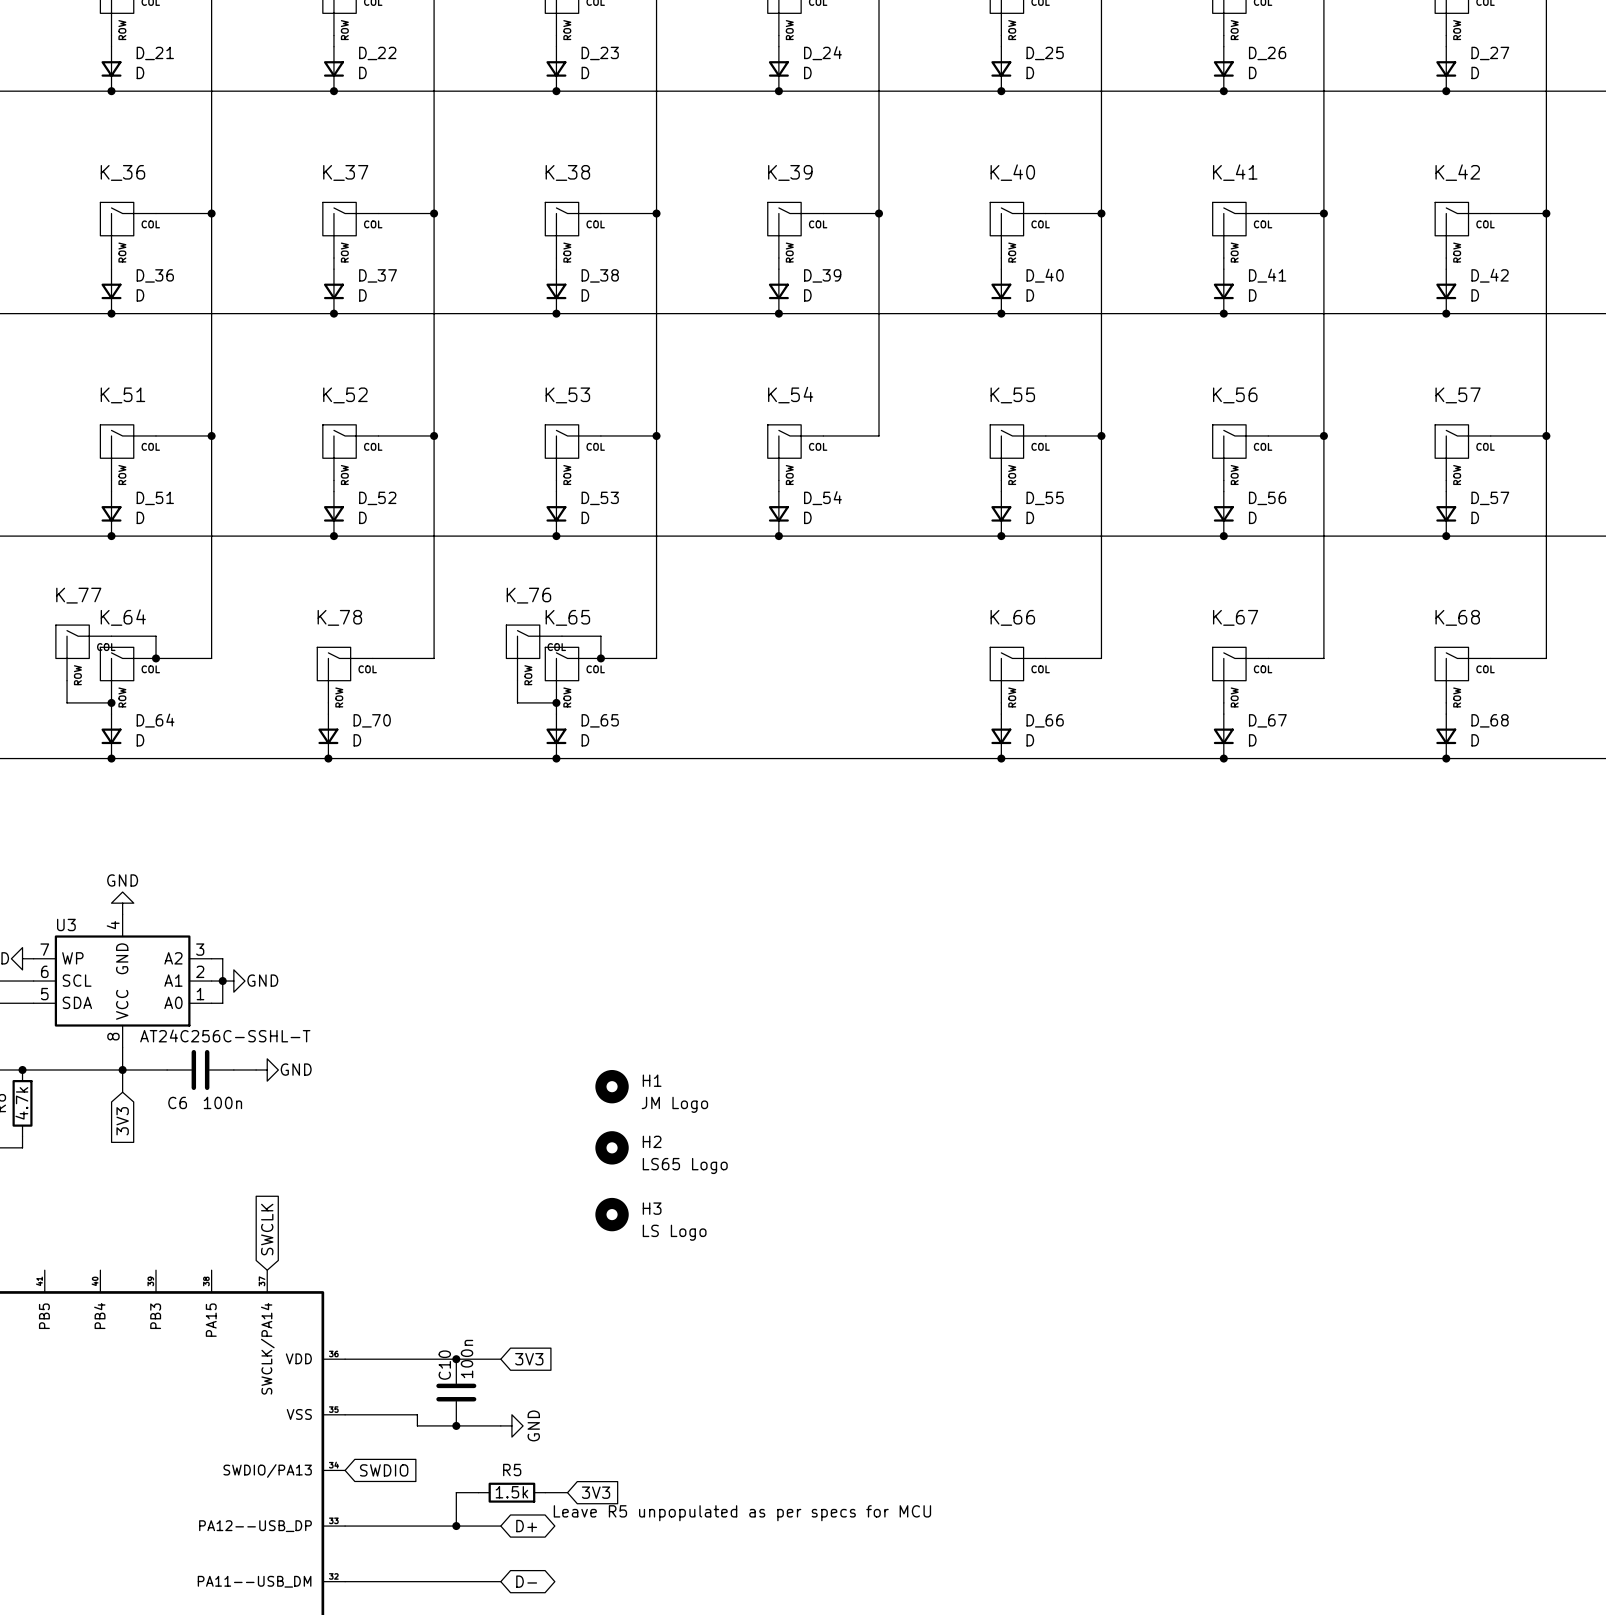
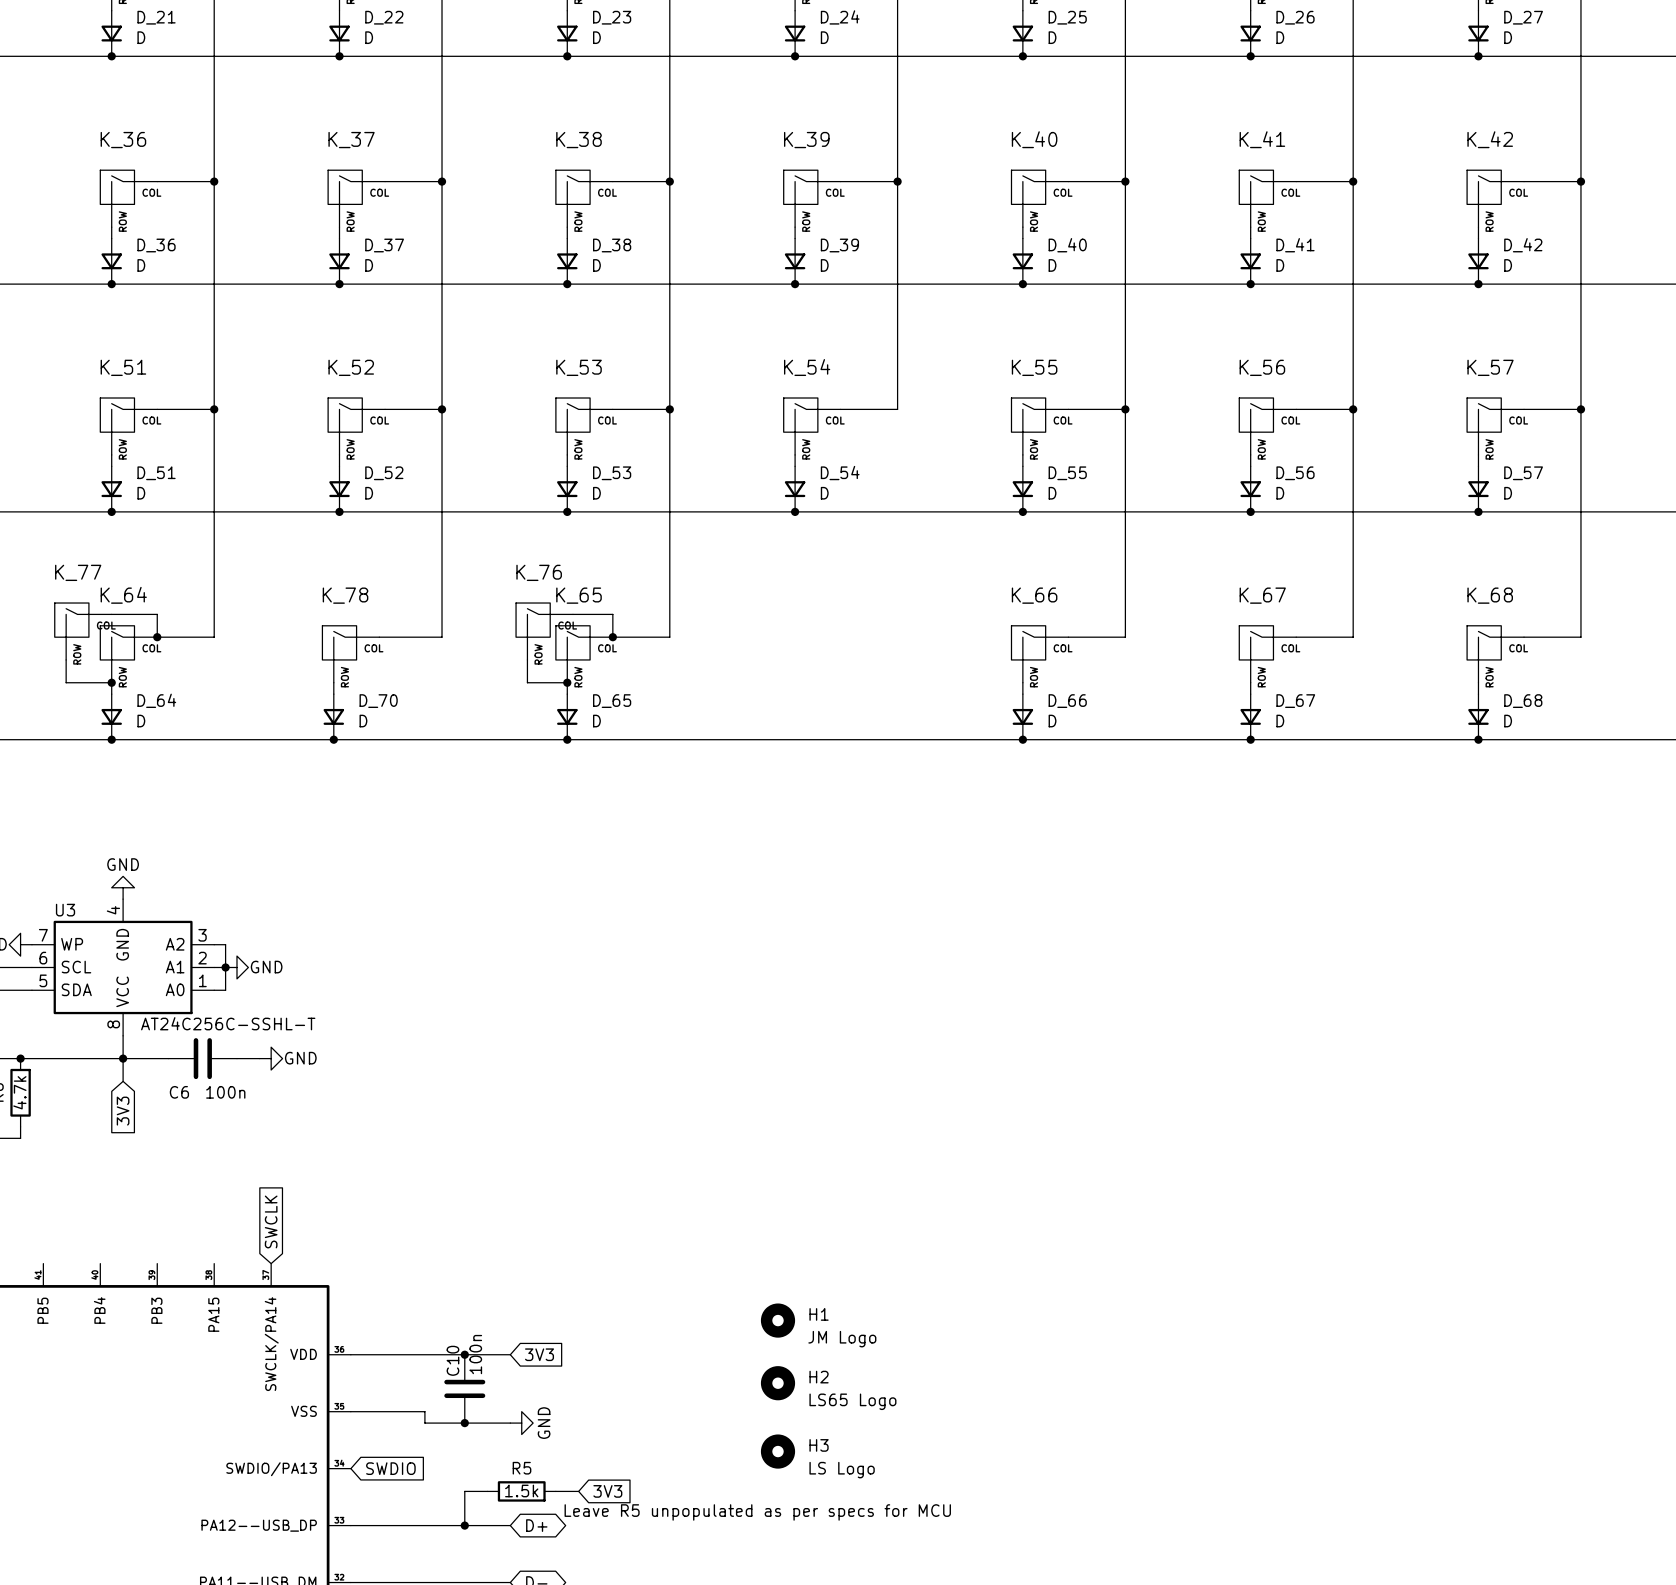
H1 position: (612, 1086) -> (778, 1320)
H2 position: (612, 1147) -> (778, 1383)
H3 position: (612, 1214) -> (778, 1451)

